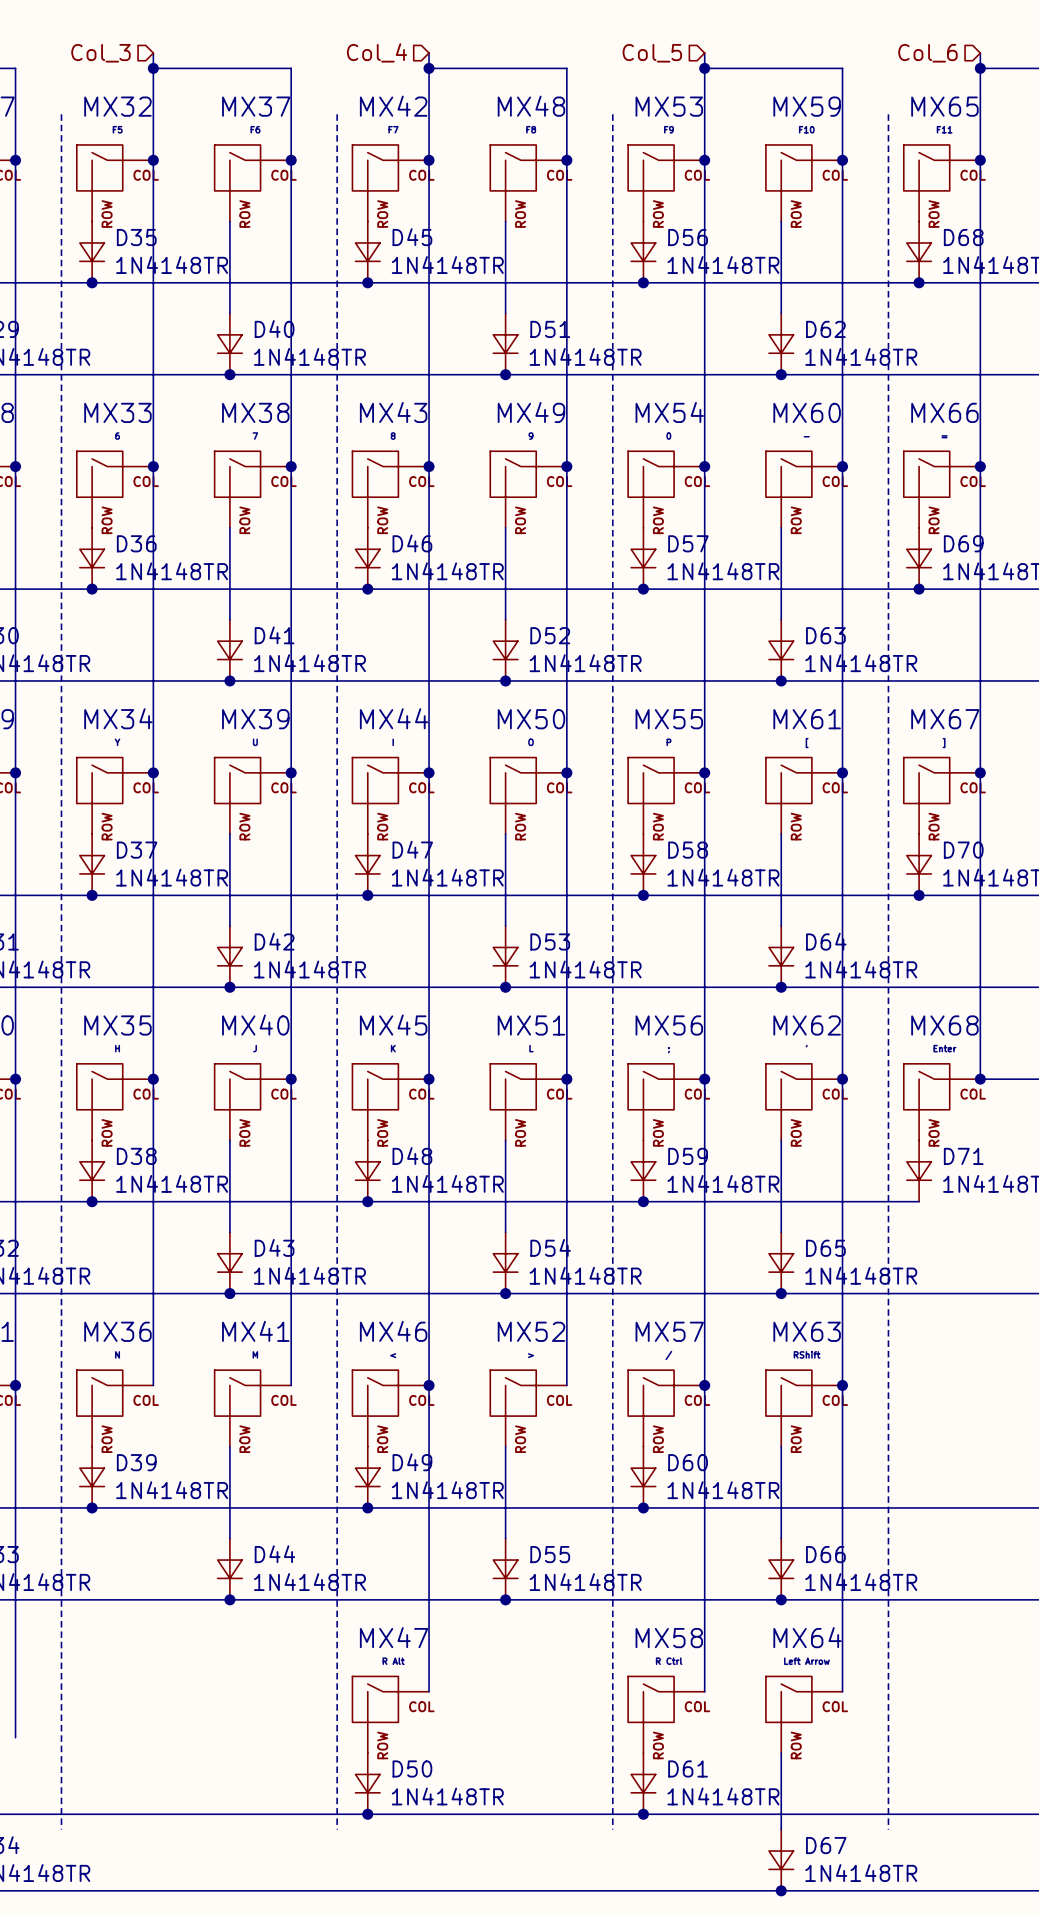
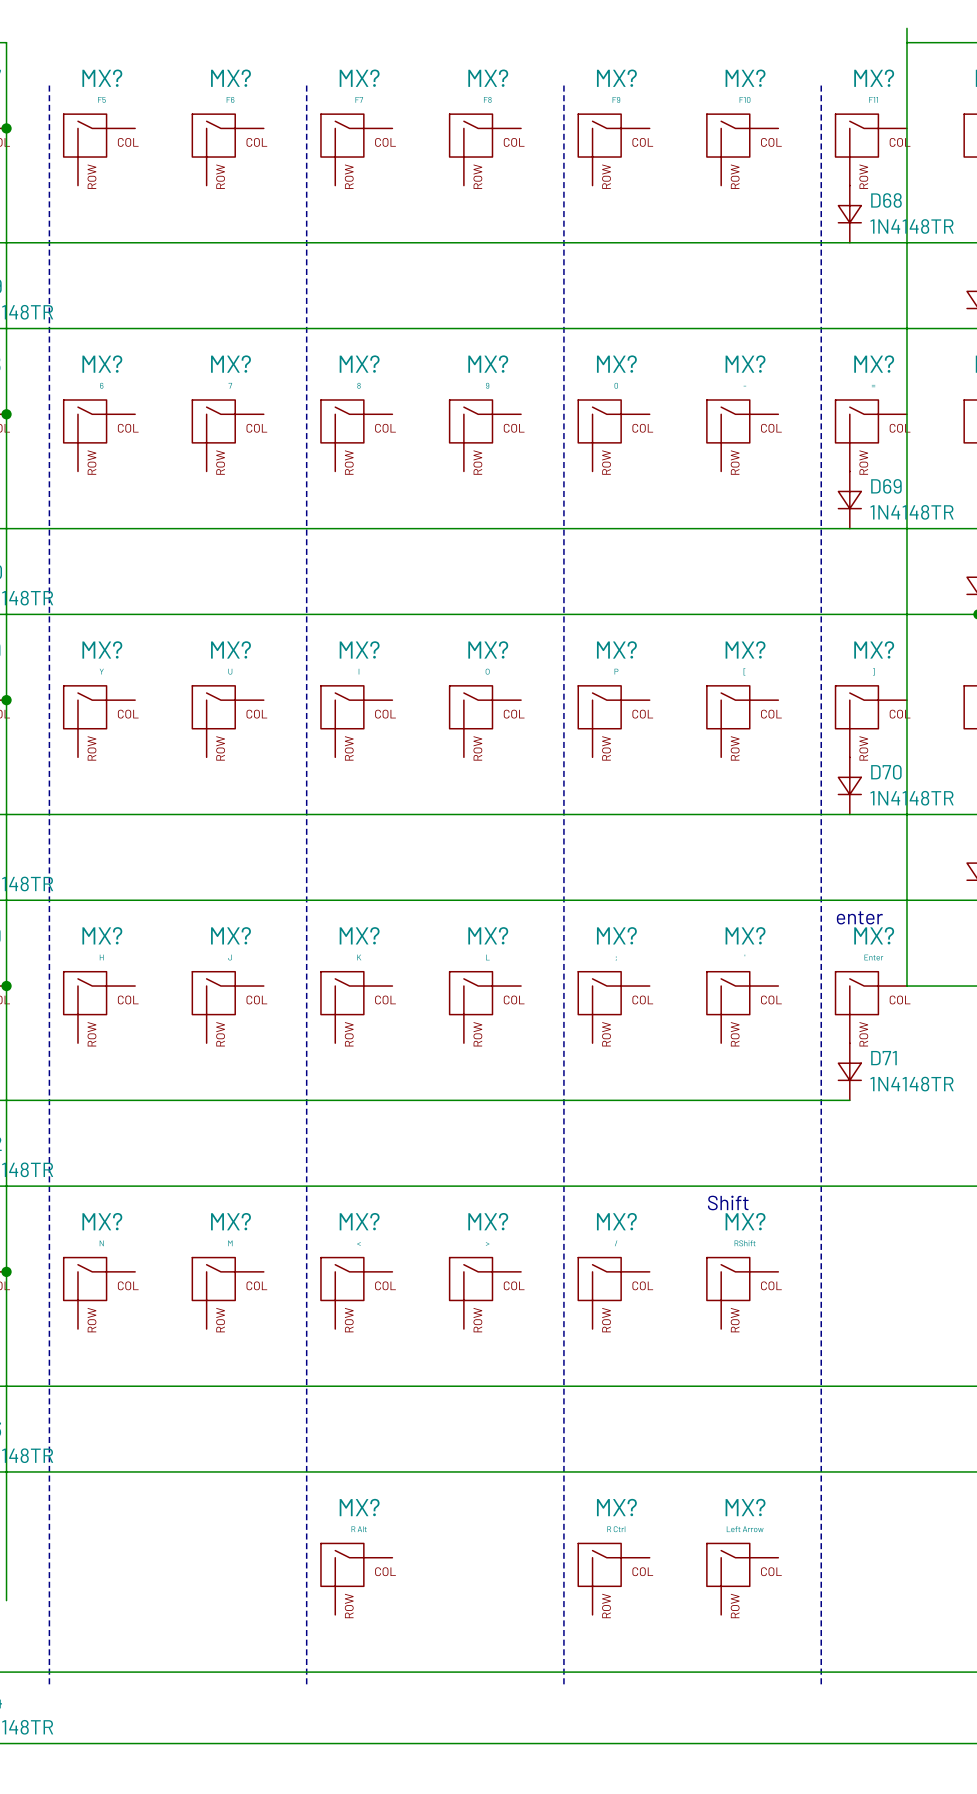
hierarchical label: Col_4 (377, 52) -> none
hierarchical label: Col_3 (100, 53) -> none
wire: (153, 53) (153, 1385) -> none
wire: (429, 53) (429, 1691) -> none
hierarchical label: Col_5 (652, 53) -> none
wire: (704, 53) (704, 1691) -> none
hierarchical label: Col_6 (927, 53) -> none
wire: (153, 68) (291, 68) (291, 1385) -> none
junction: (153, 68) -> none
wire: (429, 68) (566, 68) (566, 1385) -> none
junction: (429, 68) -> none
wire: (704, 68) (842, 68) (842, 1691) -> none
junction: (704, 68) -> none
junction: (980, 68) -> none
MX32 name: MX32 (117, 106) -> MX? (102, 78)
MX37 name: MX37 (256, 106) -> MX? (230, 78)
MX42 name: MX42 (393, 106) -> MX? (359, 78)
MX48 name: MX48 (531, 106) -> MX? (488, 78)
MX53 name: MX53 (669, 106) -> MX? (616, 78)
MX59 name: MX59 (807, 106) -> MX? (745, 78)
MX65 name: MX65 (944, 106) -> MX? (874, 78)
junction: (153, 160) -> none
junction: (291, 160) -> none
junction: (429, 160) -> none
junction: (566, 160) -> none
junction: (704, 160) -> none
junction: (842, 160) -> none
junction: (980, 160) -> none
wire: (229, 221) (229, 313) -> none
wire: (505, 221) (505, 313) -> none
wire: (781, 221) (781, 313) -> none
D35: 1N4148TR (92, 252) -> none
D45: 1N4148TR (367, 252) -> none
D56: 1N4148TR (643, 252) -> none
junction: (92, 282) -> none
junction: (367, 282) -> none
junction: (643, 282) -> none
junction: (919, 282) -> none
D40: 1N4148TR (229, 344) -> none
D51: 1N4148TR (505, 344) -> none
D62: 1N4148TR (781, 344) -> none
junction: (229, 374) -> none
junction: (505, 374) -> none
junction: (781, 374) -> none
MX33 name: MX33 (117, 412) -> MX? (102, 364)
MX38 name: MX38 (255, 412) -> MX? (230, 364)
MX43 name: MX43 (393, 412) -> MX? (359, 364)
MX49 name: MX49 (531, 412) -> MX? (488, 364)
MX54 name: MX54 (669, 412) -> MX? (616, 364)
MX60 name: MX60 (807, 412) -> MX? (745, 364)
MX66 name: MX66 (944, 412) -> MX? (874, 364)
junction: (153, 466) -> none
junction: (291, 466) -> none
junction: (429, 466) -> none
junction: (566, 466) -> none
junction: (704, 466) -> none
junction: (842, 466) -> none
junction: (980, 466) -> none
wire: (229, 527) (229, 619) -> none
wire: (505, 527) (505, 619) -> none
wire: (781, 527) (781, 619) -> none
D36: 1N4148TR (92, 558) -> none
D46: 1N4148TR (367, 558) -> none
D57: 1N4148TR (643, 558) -> none
junction: (92, 589) -> none
junction: (367, 589) -> none
junction: (643, 589) -> none
junction: (919, 589) -> none
D41: 1N4148TR (229, 650) -> none
D52: 1N4148TR (505, 650) -> none
D63: 1N4148TR (781, 650) -> none
junction: (229, 680) -> none
junction: (505, 680) -> none
junction: (781, 680) -> none
MX34 name: MX34 (118, 718) -> MX? (102, 649)
MX44 name: MX44 (394, 718) -> MX? (359, 649)
MX39 name: MX39 (255, 719) -> MX? (230, 649)
MX50 name: MX50 (531, 719) -> MX? (488, 649)
MX55 name: MX55 (669, 719) -> MX? (616, 649)
MX61 name: MX61 (807, 719) -> MX? (745, 649)
MX67 name: MX67 (945, 719) -> MX? (874, 649)
junction: (153, 772) -> none
junction: (291, 772) -> none
junction: (429, 772) -> none
junction: (566, 772) -> none
junction: (704, 772) -> none
junction: (842, 772) -> none
junction: (980, 772) -> none
wire: (229, 834) (229, 926) -> none
wire: (505, 834) (505, 926) -> none
wire: (781, 834) (781, 926) -> none
D37: 1N4148TR (92, 864) -> none
D47: 1N4148TR (367, 864) -> none
D58: 1N4148TR (643, 864) -> none
junction: (92, 895) -> none
junction: (367, 895) -> none
junction: (643, 895) -> none
junction: (919, 895) -> none
D42: 1N4148TR (229, 956) -> none
D53: 1N4148TR (505, 956) -> none
D64: 1N4148TR (781, 956) -> none
junction: (229, 987) -> none
junction: (505, 987) -> none
junction: (781, 987) -> none
text: none -> enter (859, 917)
MX35 name: MX35 (117, 1025) -> MX? (102, 935)
MX40 name: MX40 (255, 1025) -> MX? (230, 935)
MX45 name: MX45 (393, 1025) -> MX? (359, 935)
MX51 name: MX51 (531, 1025) -> MX? (488, 935)
MX56 name: MX56 (669, 1025) -> MX? (616, 935)
MX62 name: MX62 (807, 1025) -> MX? (745, 935)
MX68 name: MX68 (944, 1025) -> MX? (874, 935)
junction: (153, 1079) -> none
junction: (291, 1079) -> none
junction: (429, 1079) -> none
junction: (566, 1079) -> none
junction: (704, 1079) -> none
junction: (842, 1079) -> none
junction: (980, 1079) -> none
wire: (229, 1140) (229, 1232) -> none
wire: (505, 1140) (505, 1232) -> none
wire: (781, 1140) (781, 1232) -> none
D38: 1N4148TR (92, 1171) -> none
D48: 1N4148TR (367, 1171) -> none
D59: 1N4148TR (643, 1171) -> none
junction: (92, 1201) -> none
junction: (367, 1201) -> none
junction: (643, 1201) -> none
D43: 1N4148TR (229, 1262) -> none
D54: 1N4148TR (505, 1262) -> none
D65: 1N4148TR (781, 1262) -> none
junction: (229, 1293) -> none
junction: (505, 1293) -> none
junction: (781, 1293) -> none
text: none -> Shift (728, 1202)
MX36 name: MX36 (117, 1331) -> MX? (102, 1221)
MX41 name: MX41 (255, 1331) -> MX? (230, 1221)
MX46 name: MX46 (393, 1331) -> MX? (359, 1221)
MX52 name: MX52 (531, 1331) -> MX? (488, 1221)
MX57 name: MX57 (669, 1331) -> MX? (616, 1221)
MX63 name: MX63 (807, 1331) -> MX? (745, 1221)
junction: (429, 1385) -> none
junction: (704, 1385) -> none
junction: (842, 1385) -> none
wire: (229, 1446) (229, 1538) -> none
wire: (505, 1446) (505, 1538) -> none
wire: (781, 1446) (781, 1538) -> none
D39: 1N4148TR (92, 1477) -> none
D49: 1N4148TR (367, 1477) -> none
D60: 1N4148TR (643, 1477) -> none
junction: (92, 1507) -> none
junction: (367, 1507) -> none
junction: (643, 1507) -> none
D44: 1N4148TR (229, 1569) -> none
D55: 1N4148TR (505, 1569) -> none
D66: 1N4148TR (781, 1569) -> none
junction: (229, 1599) -> none
junction: (505, 1599) -> none
junction: (781, 1599) -> none
MX47 name: MX47 (394, 1637) -> MX? (359, 1507)
MX64 name: MX64 (807, 1637) -> MX? (745, 1507)
MX58 name: MX58 (669, 1638) -> MX? (616, 1507)
wire: (781, 1753) (781, 1829) -> none
D50: 1N4148TR (367, 1783) -> none
D61: 1N4148TR (643, 1783) -> none
junction: (367, 1814) -> none
junction: (643, 1814) -> none
D67: 1N4148TR (781, 1860) -> none
junction: (781, 1890) -> none

